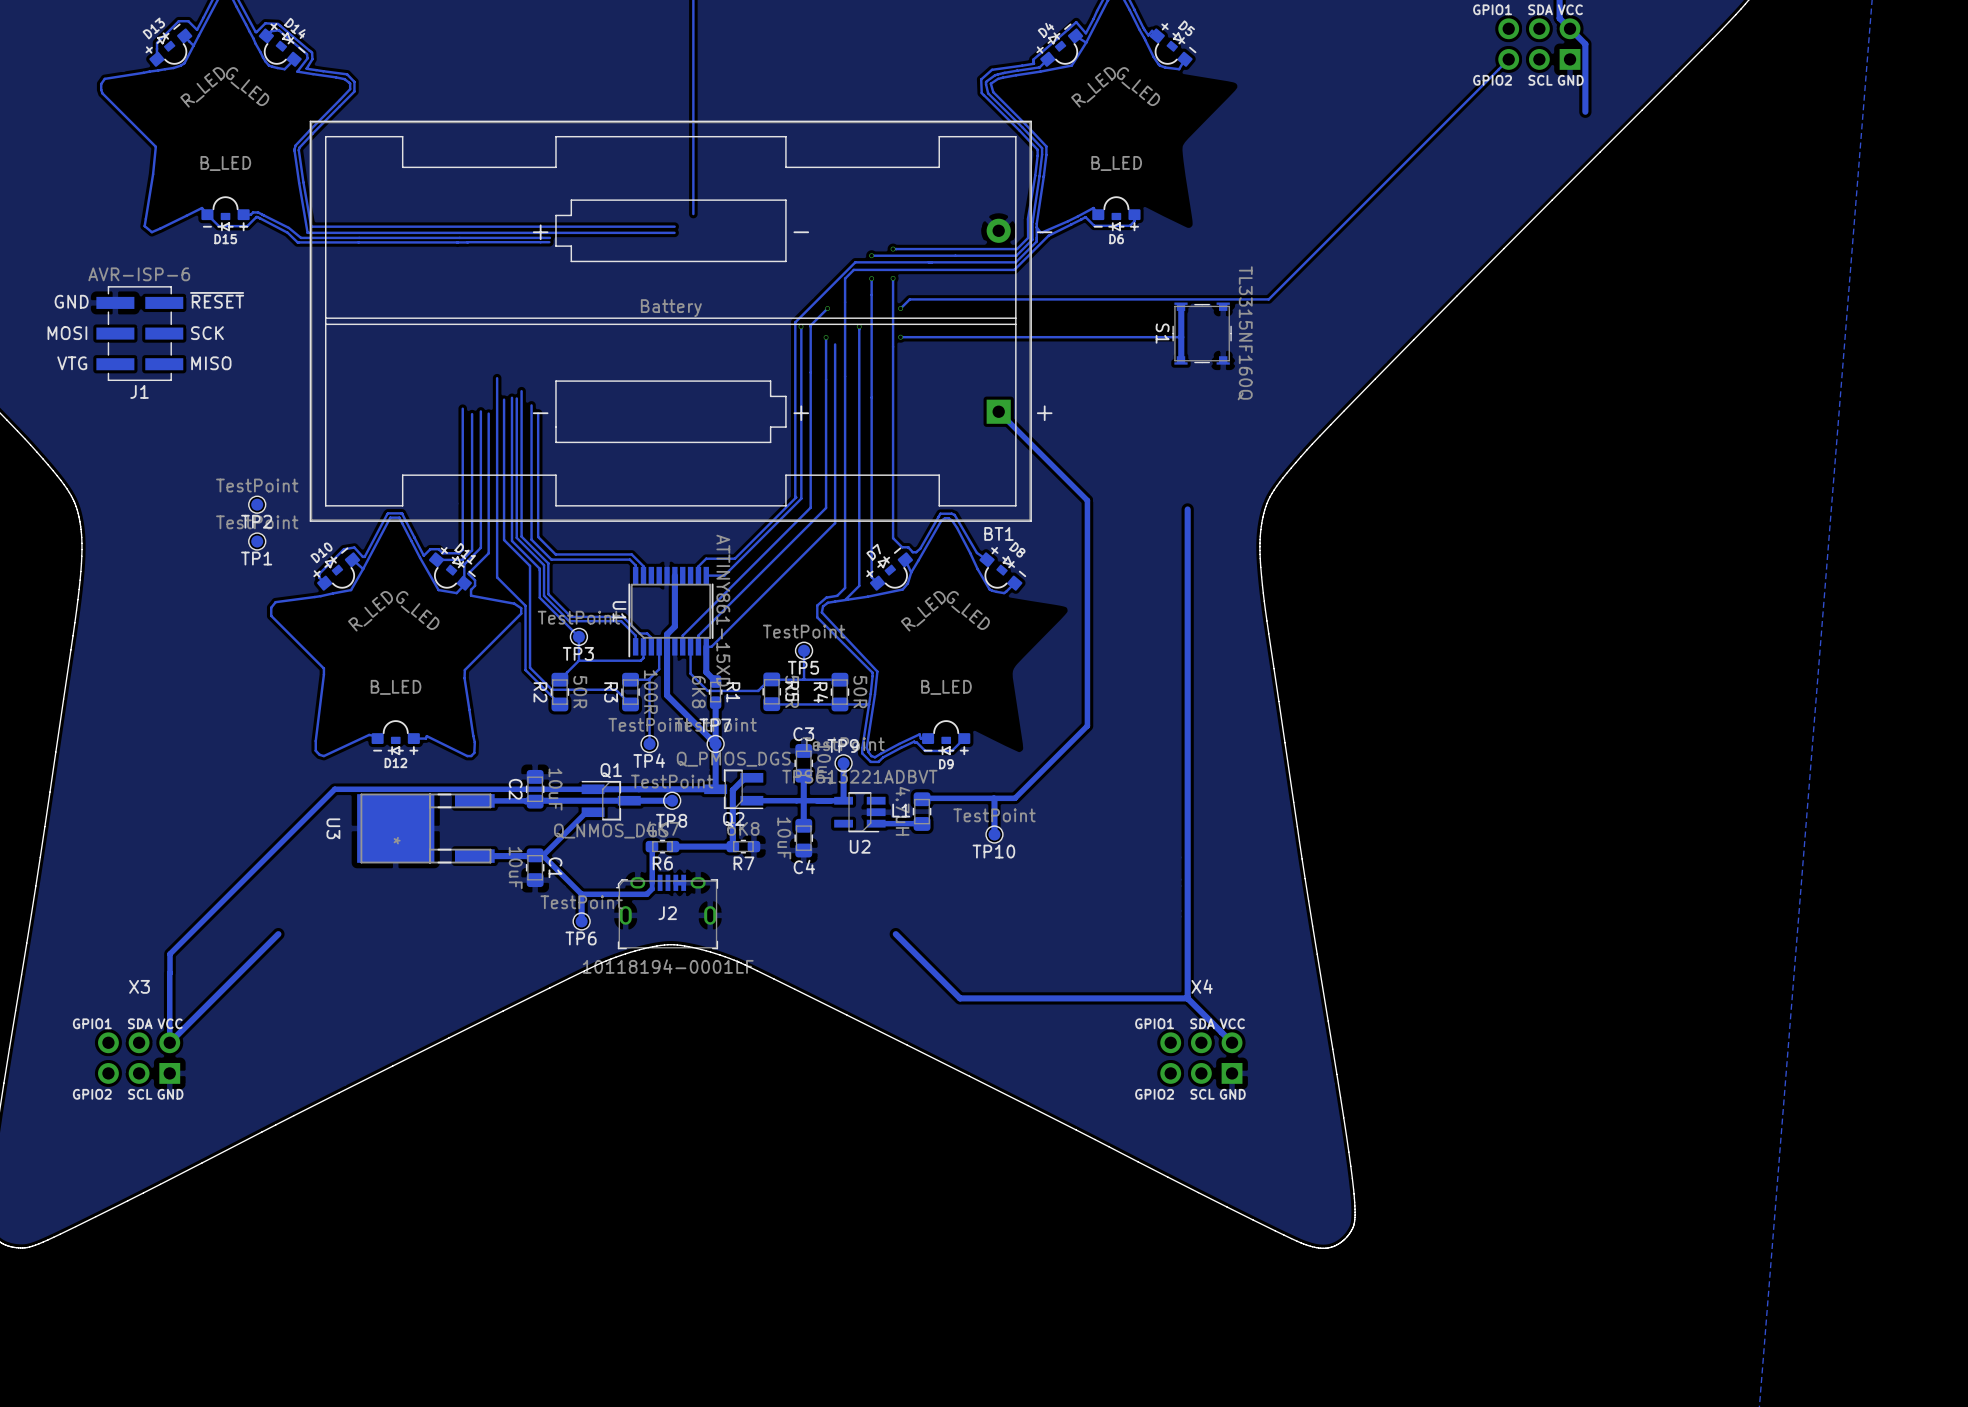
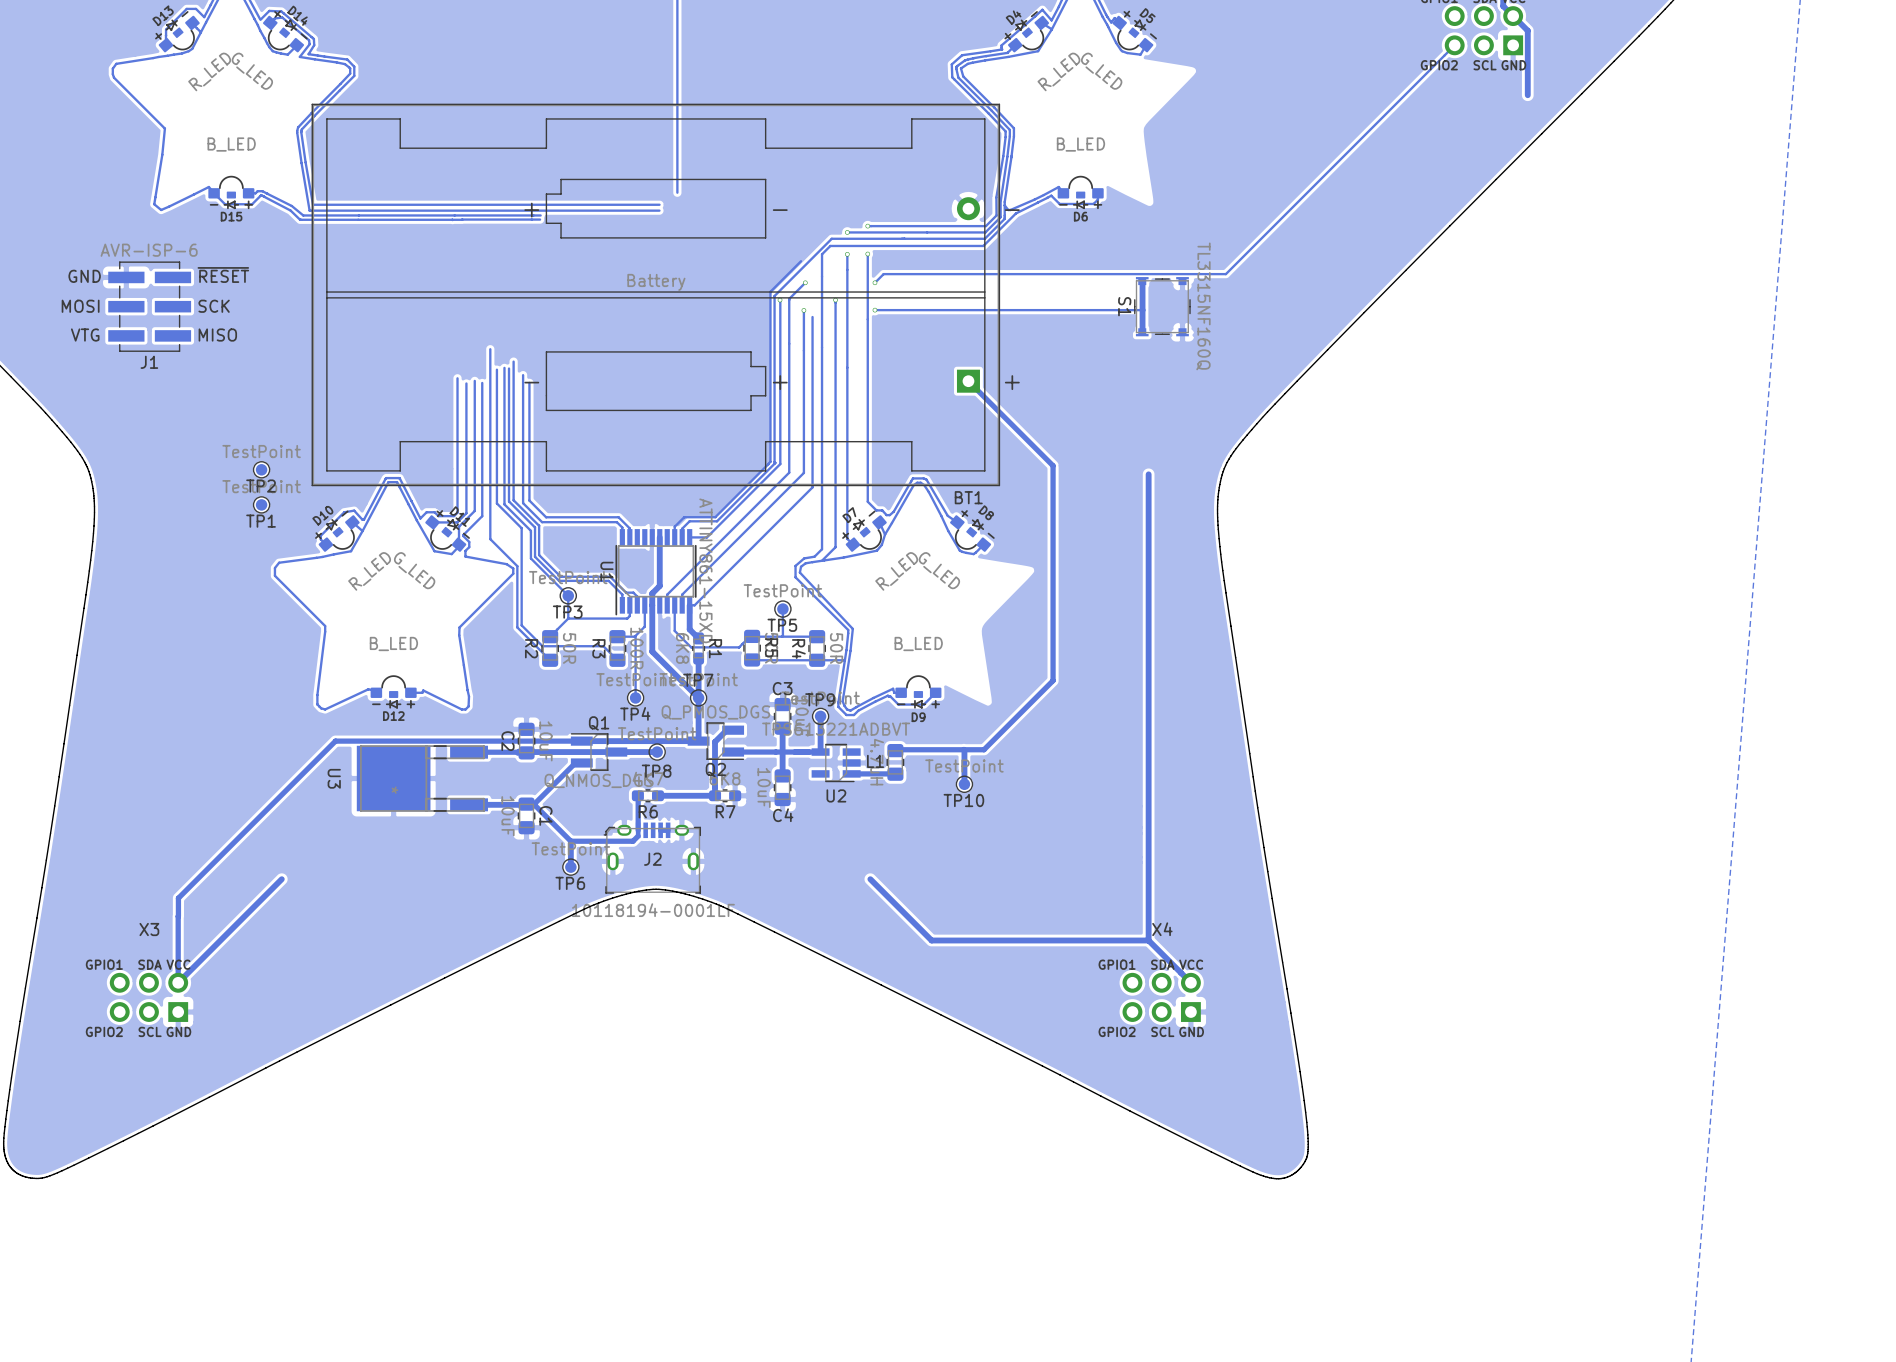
track: none -> (801, 261) (770, 291) (770, 461) (715, 517) (684, 517) (674, 526) (674, 537)

